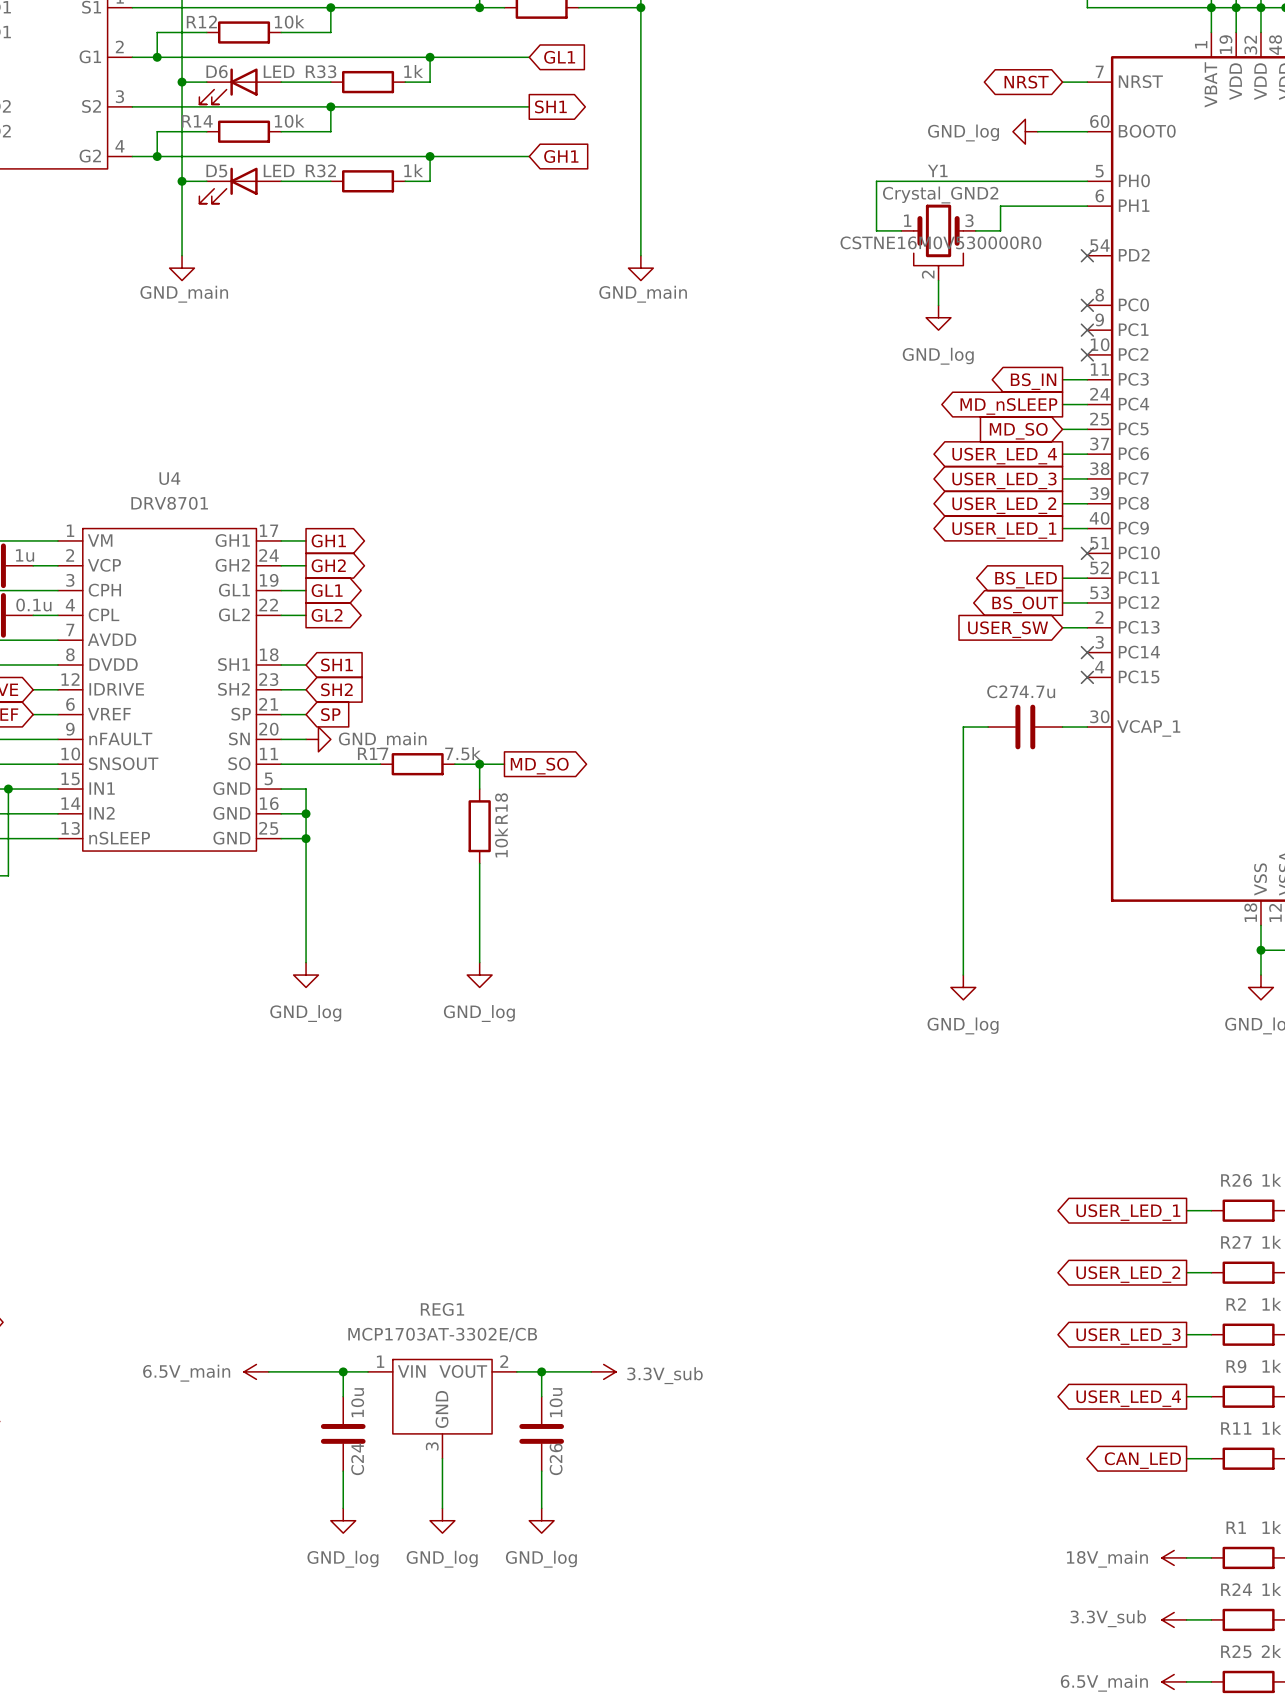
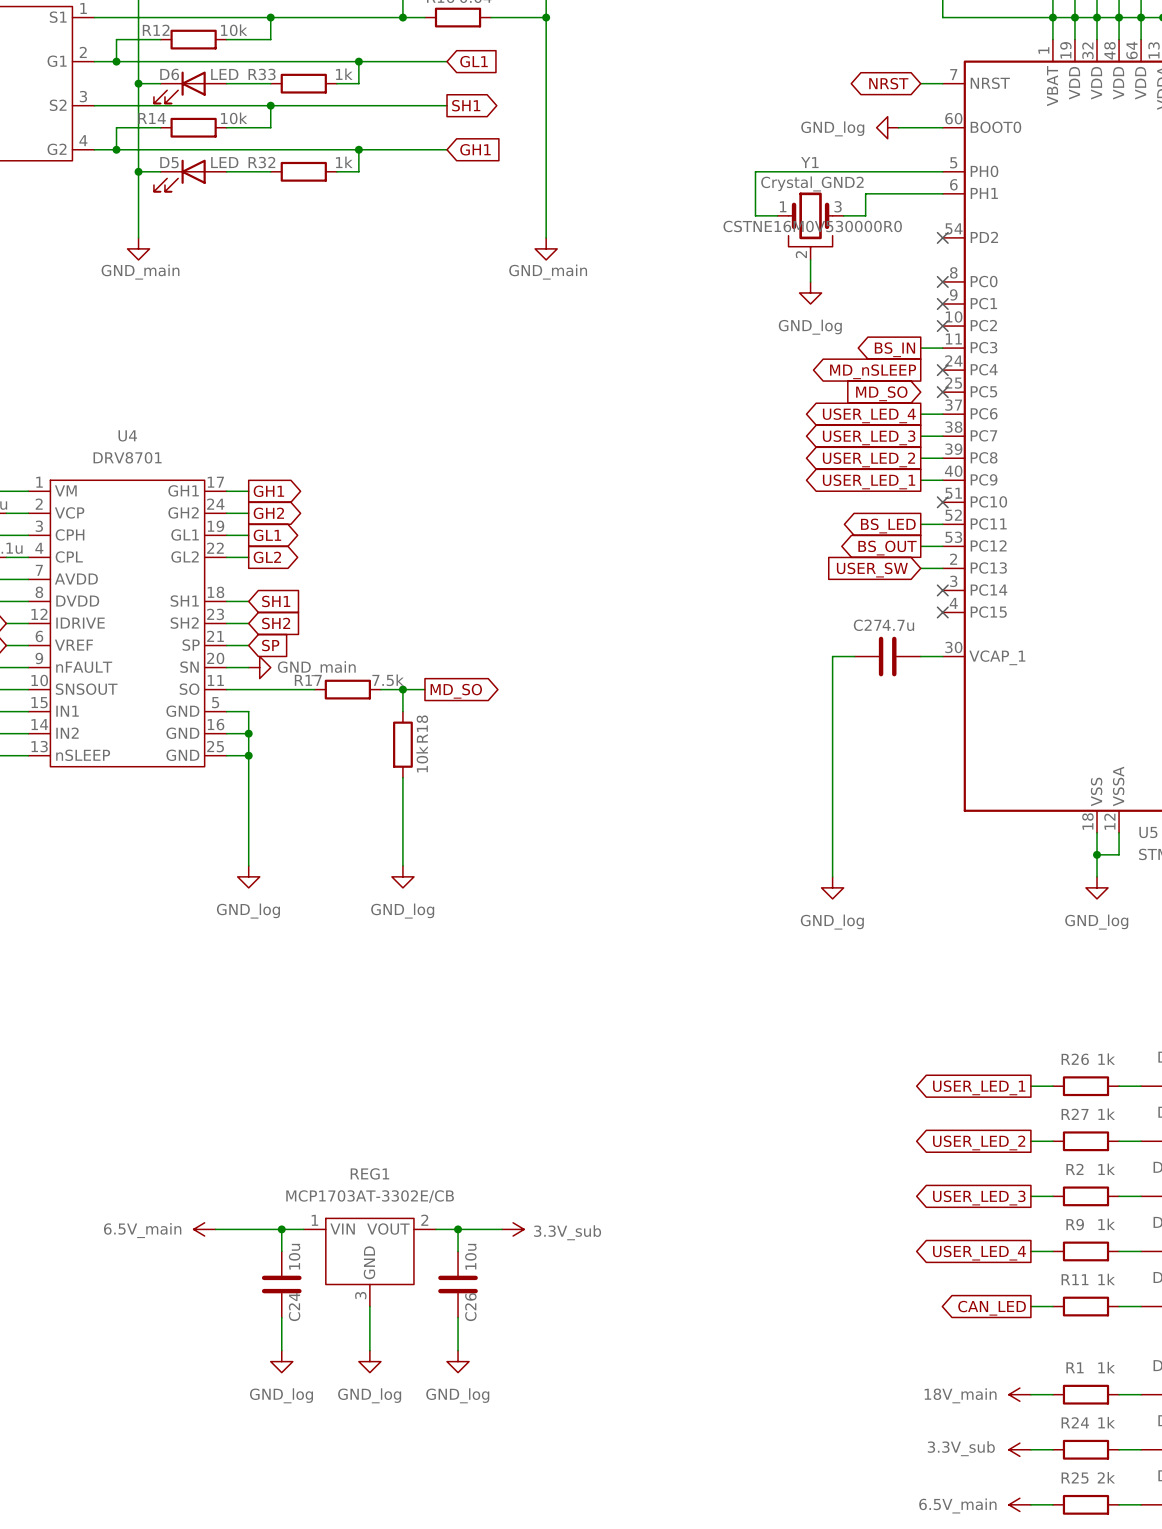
wire: (1062, 404) (1087, 404) -> none
no-connect mark: none -> (942, 370)
wire: (1062, 429) (1087, 429) -> none
no-connect mark: none -> (942, 392)

